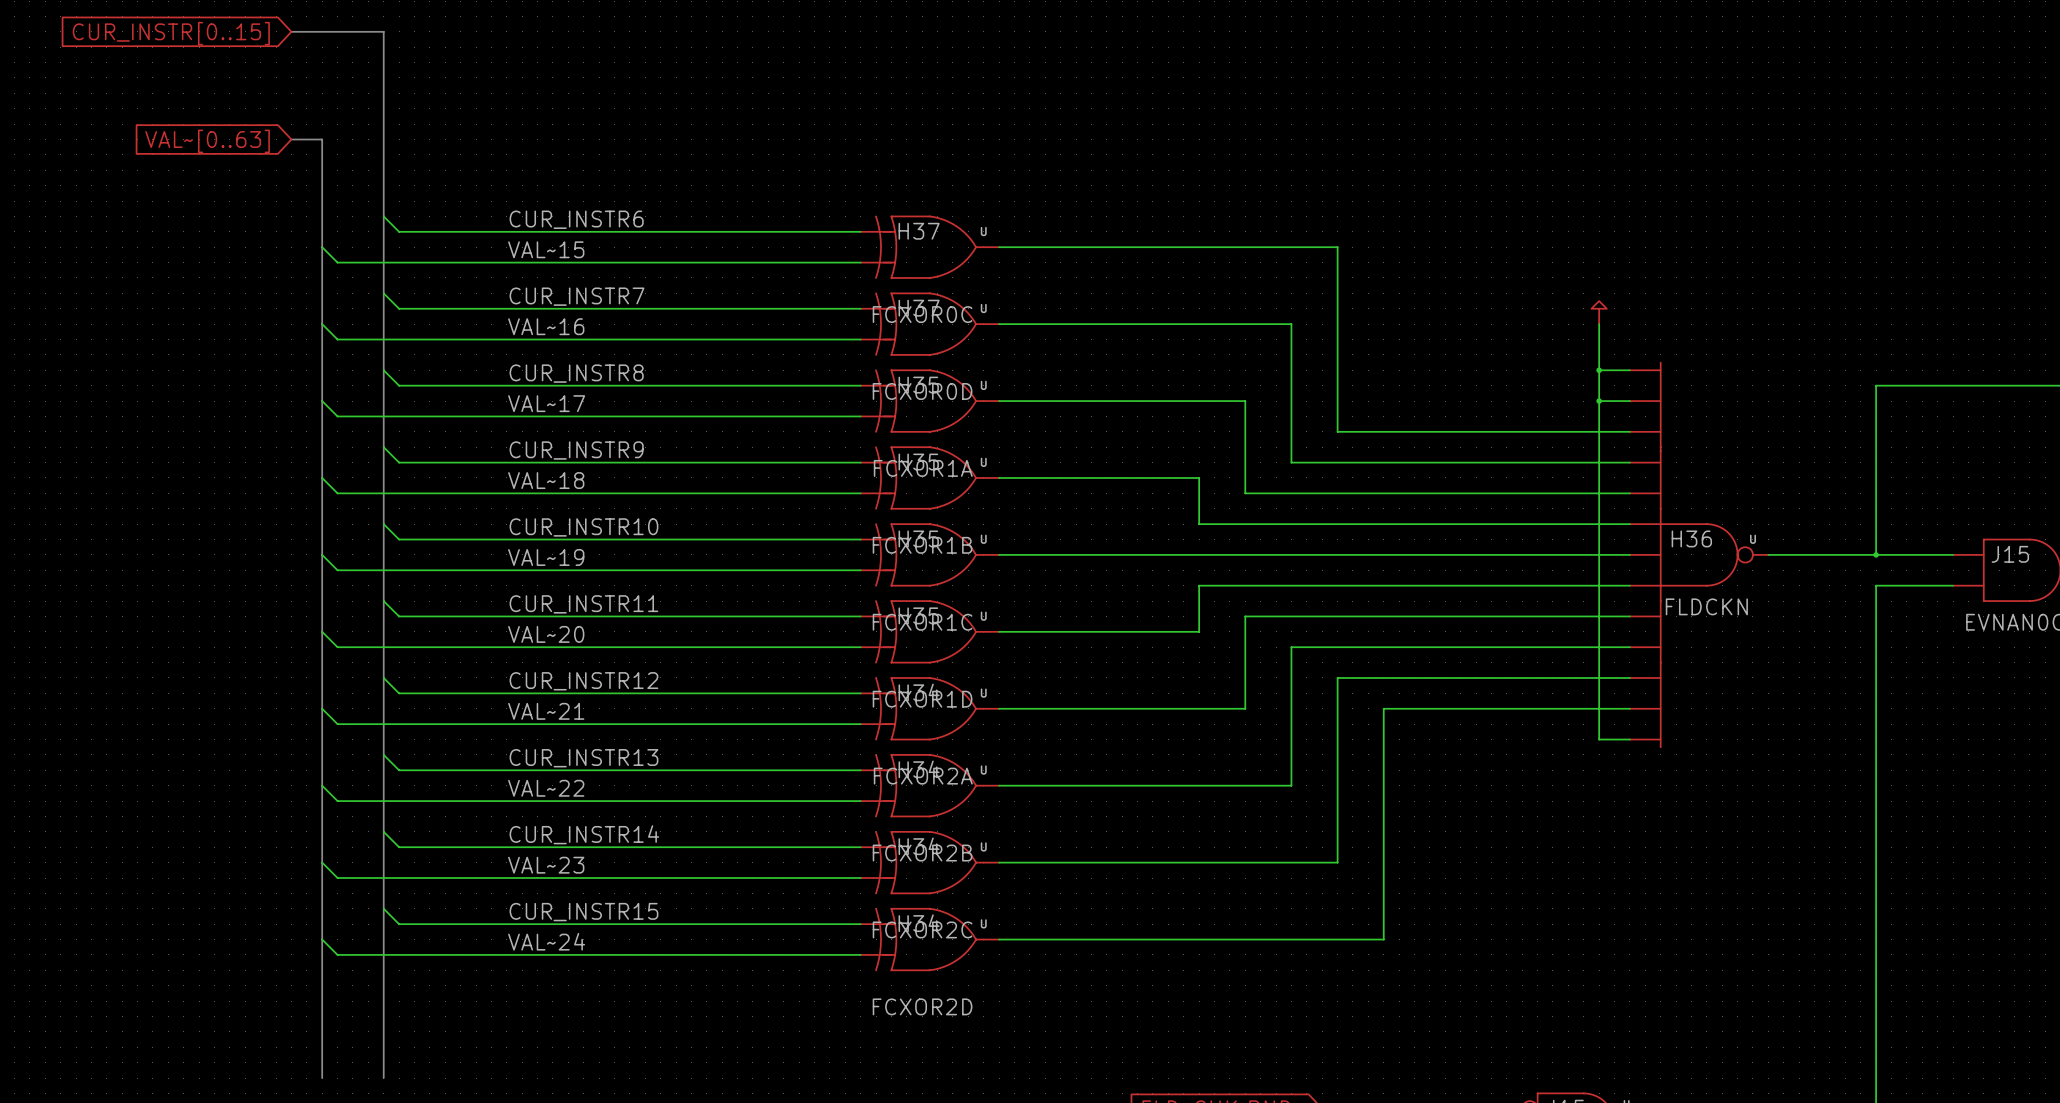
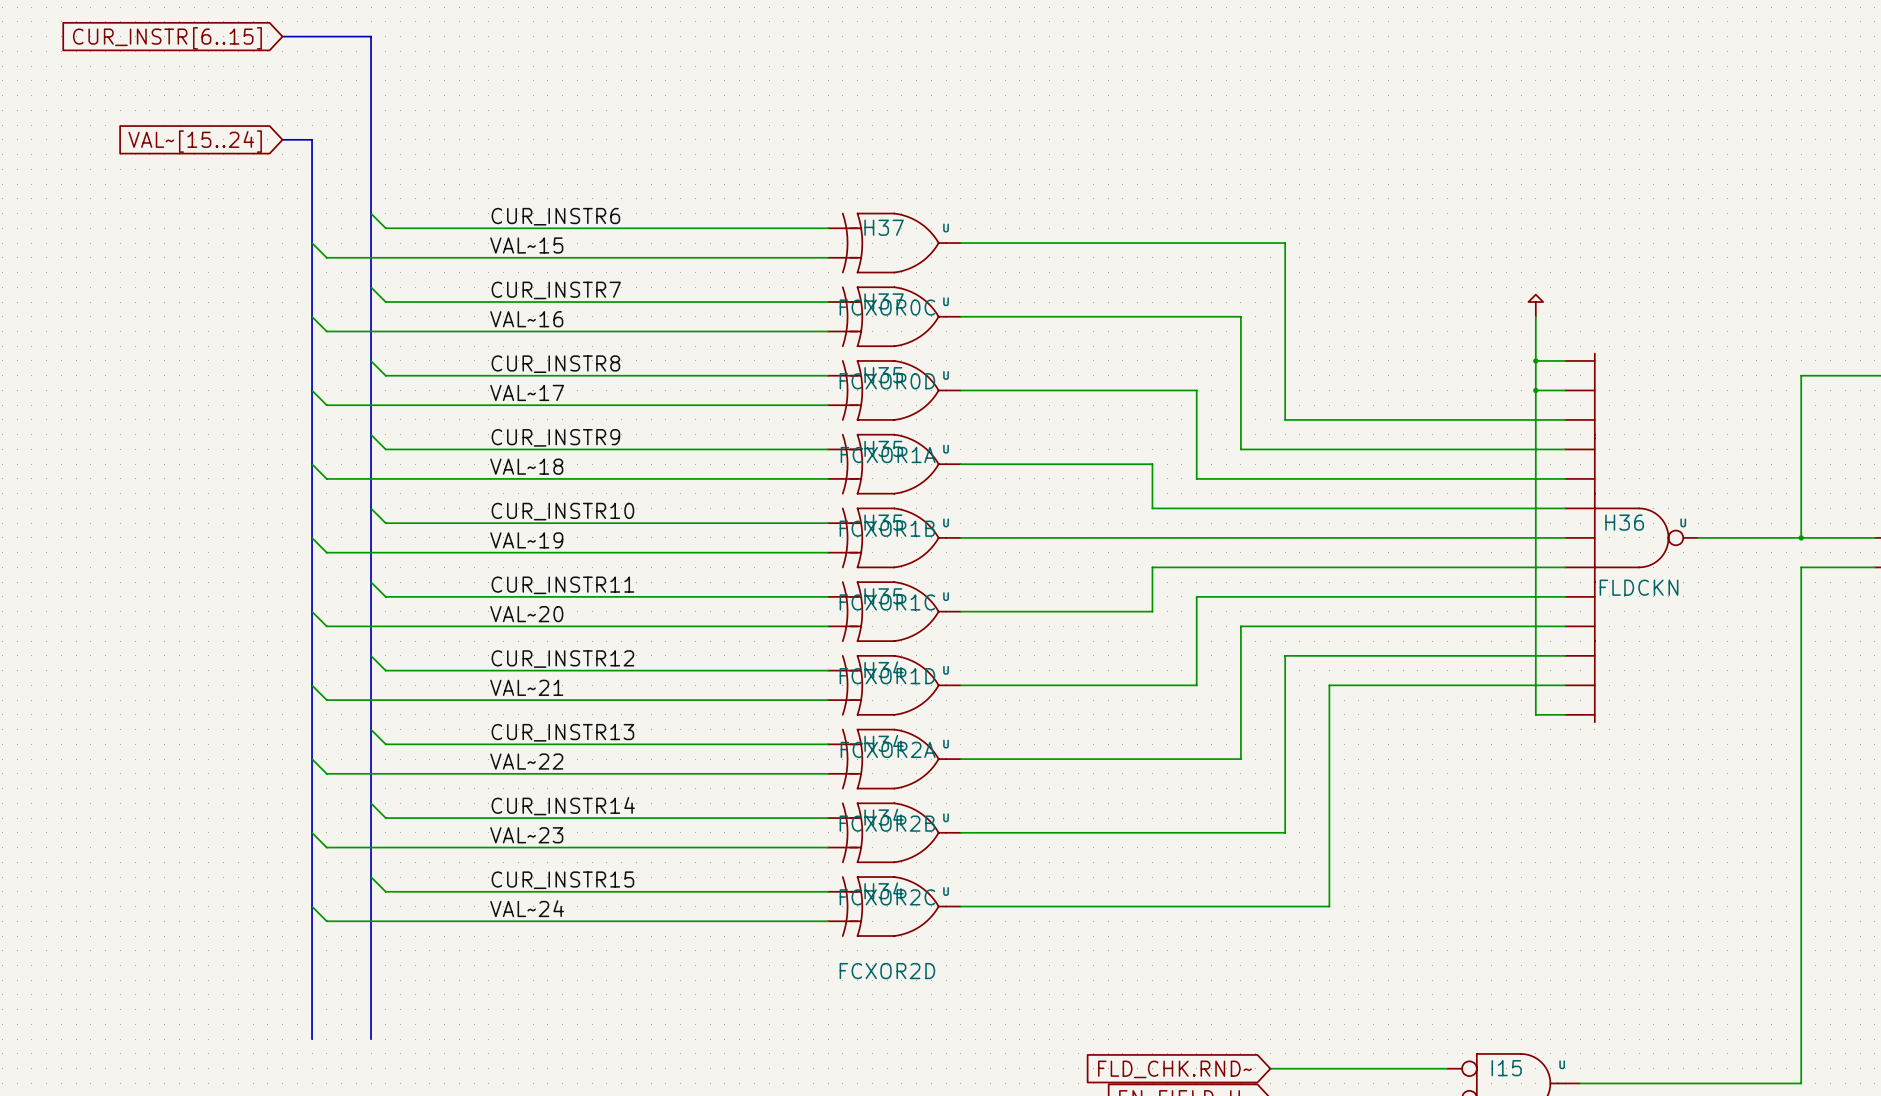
global label: CUR_INSTR[0..15] (171, 33) -> CUR_INSTR[6..15] (167, 38)
global label: VAL~[0..63] (207, 141) -> VAL~[15..24] (195, 141)

